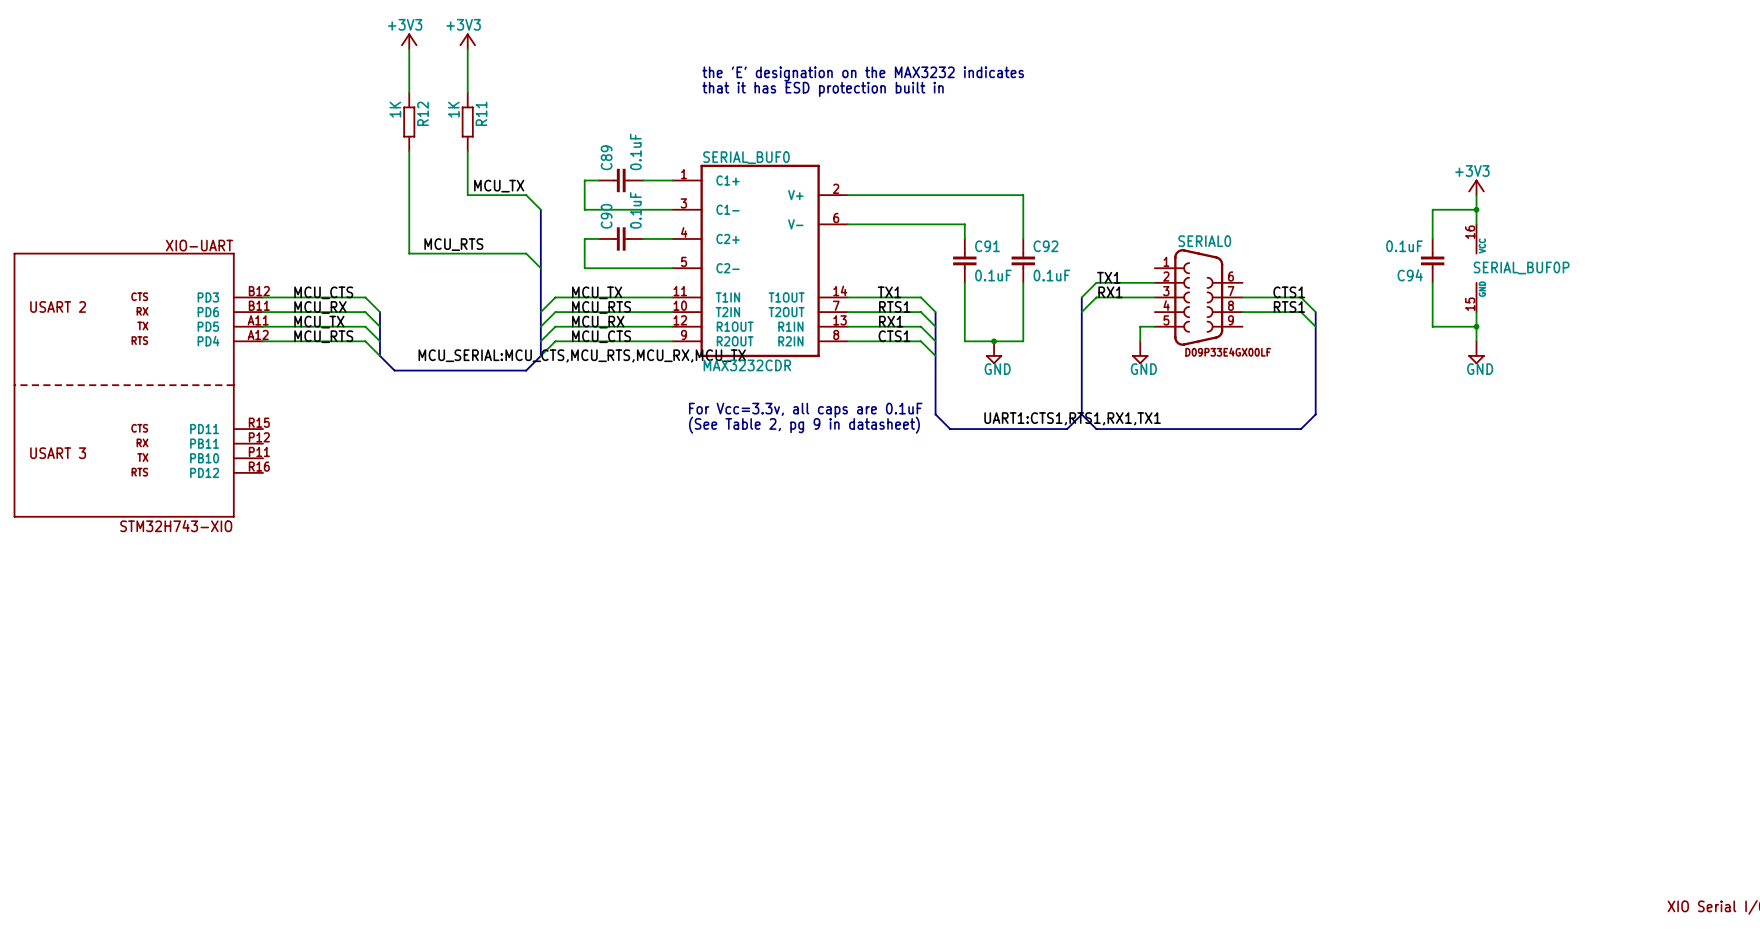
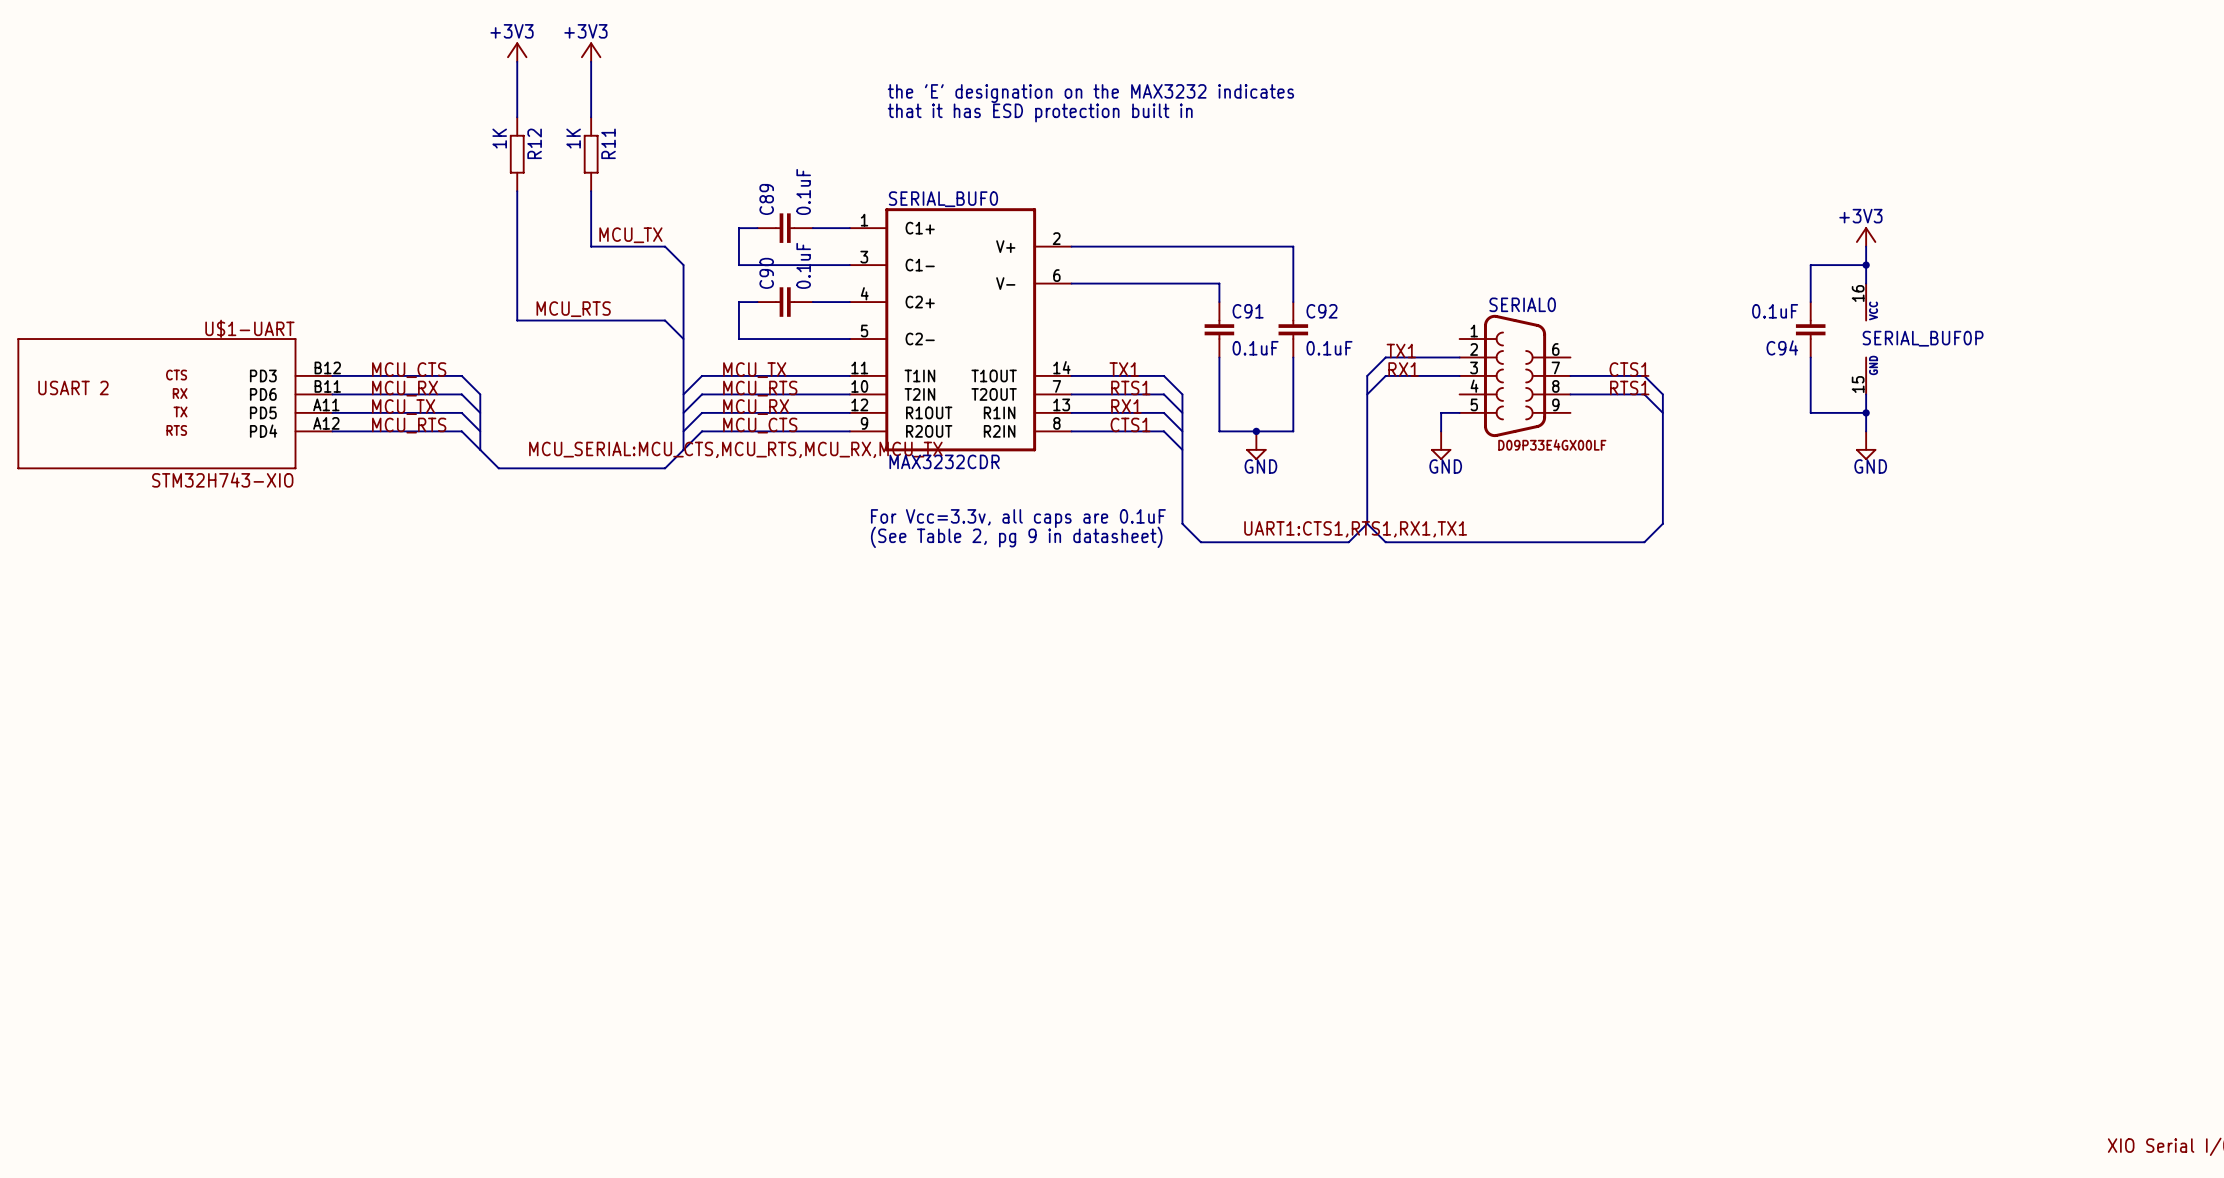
U$1-UART: none -> STM32H743-XIO (174, 403)
XIO-UART: STM32H743-XIO (138, 385) -> none

